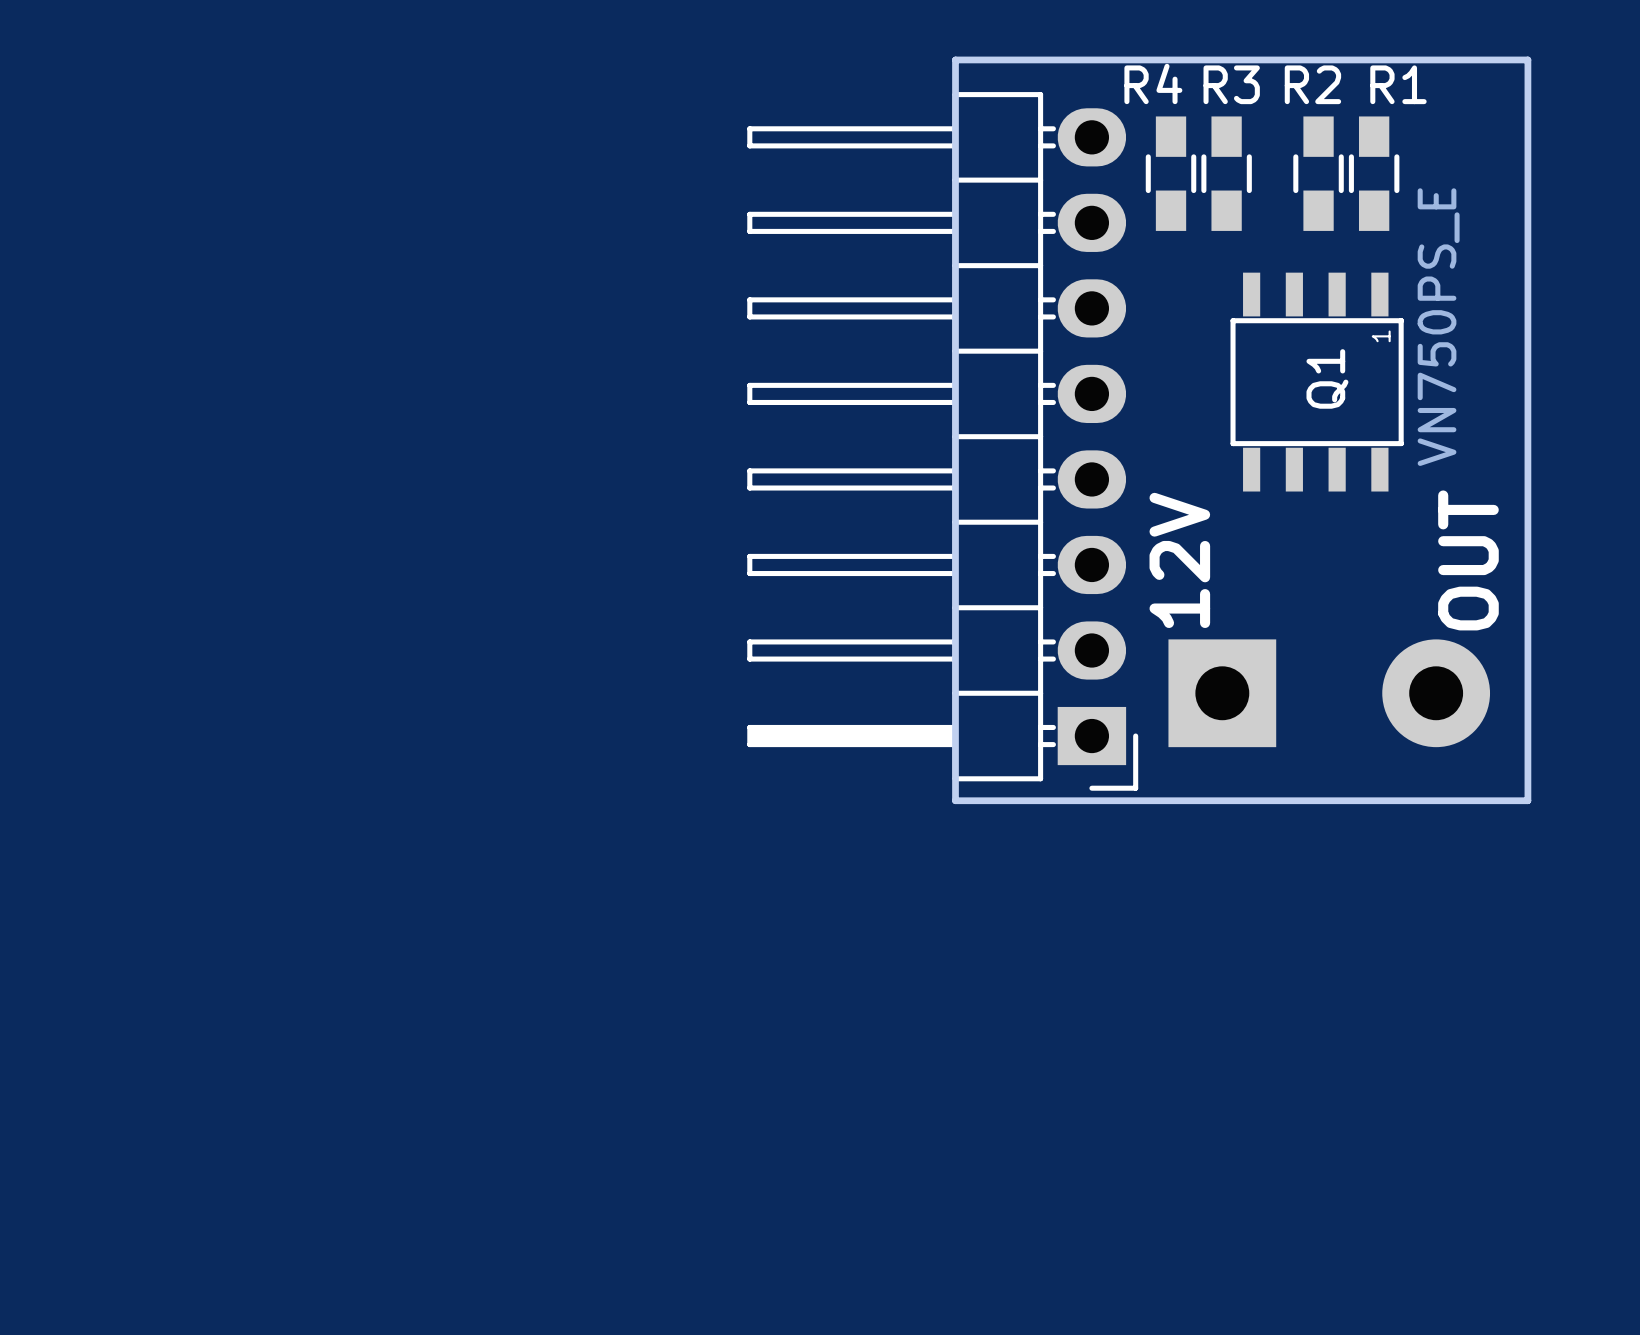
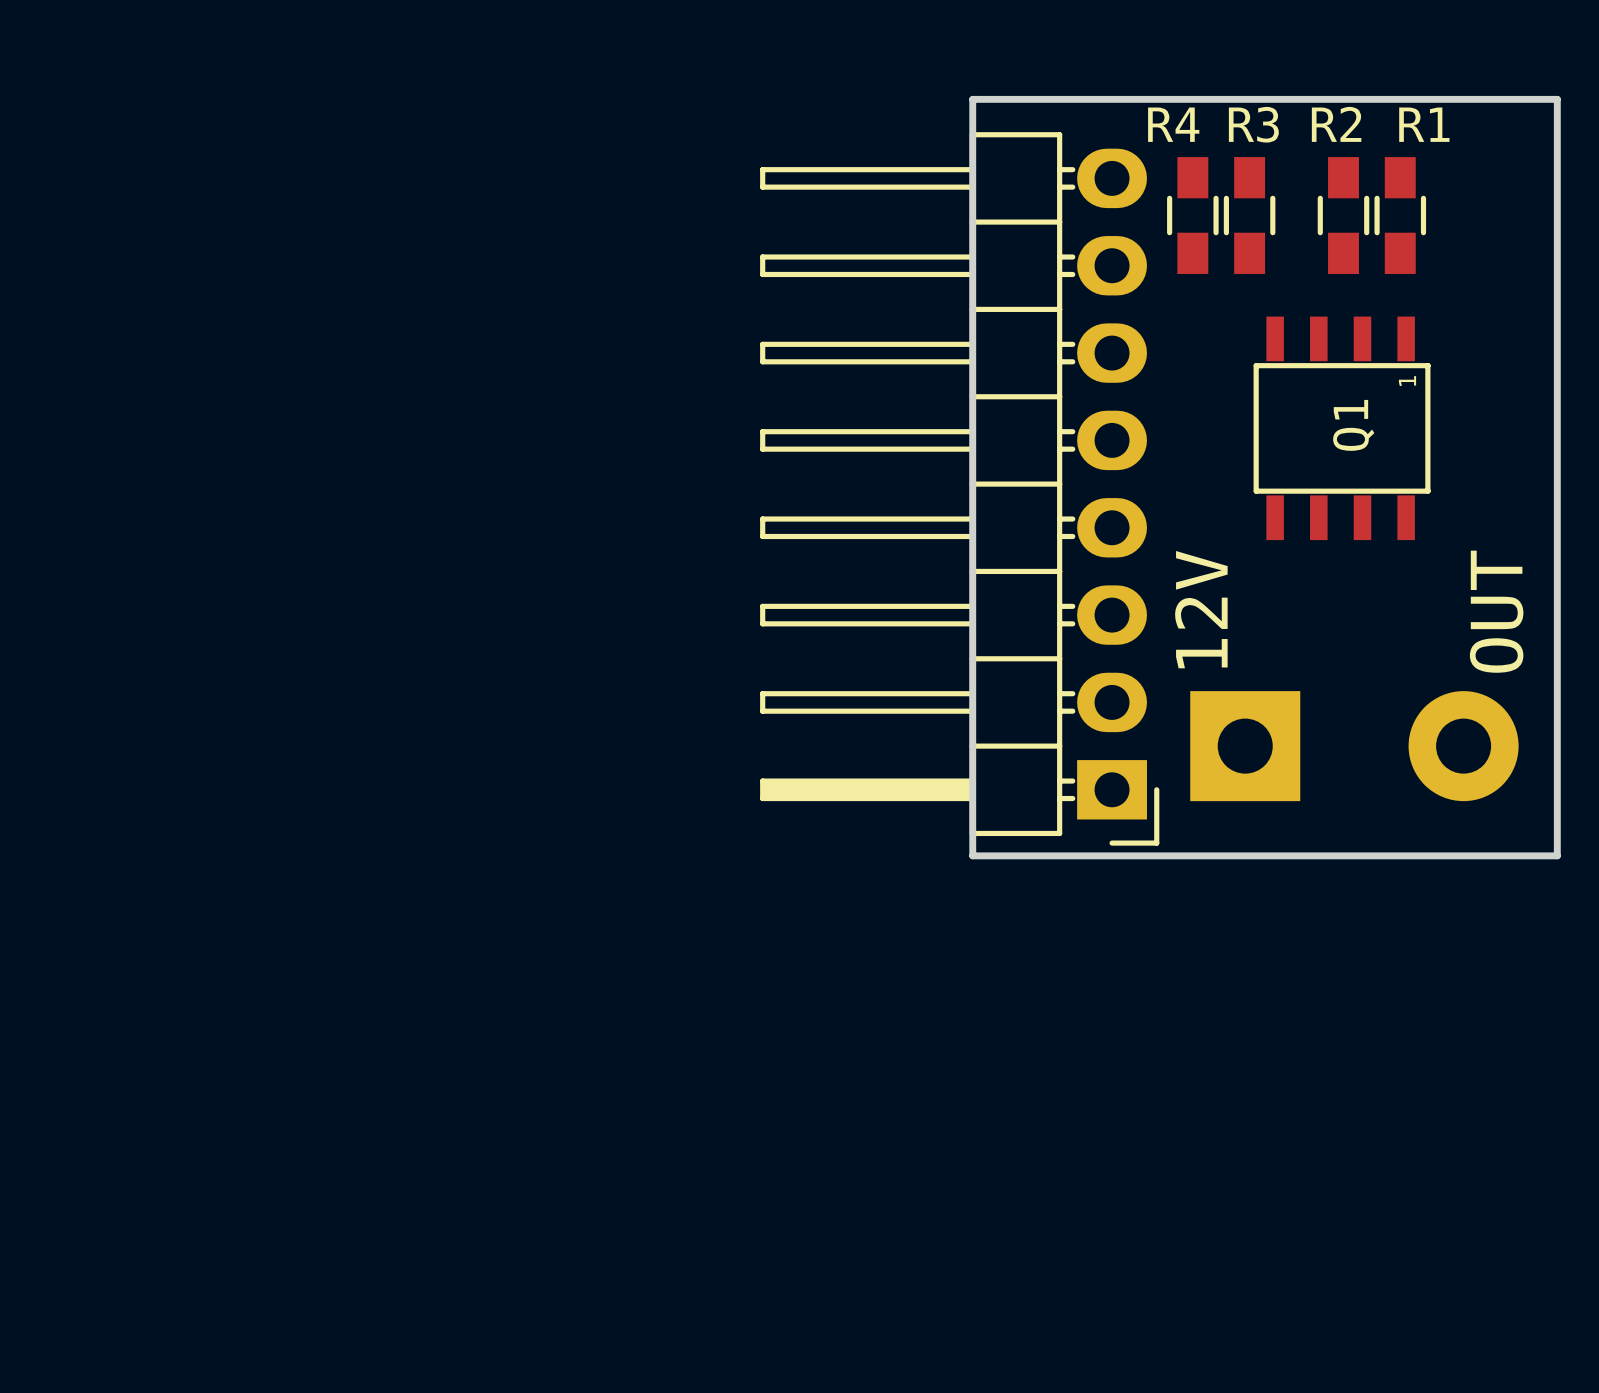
Q1 value: VN750PS_E (1438, 327) -> none

